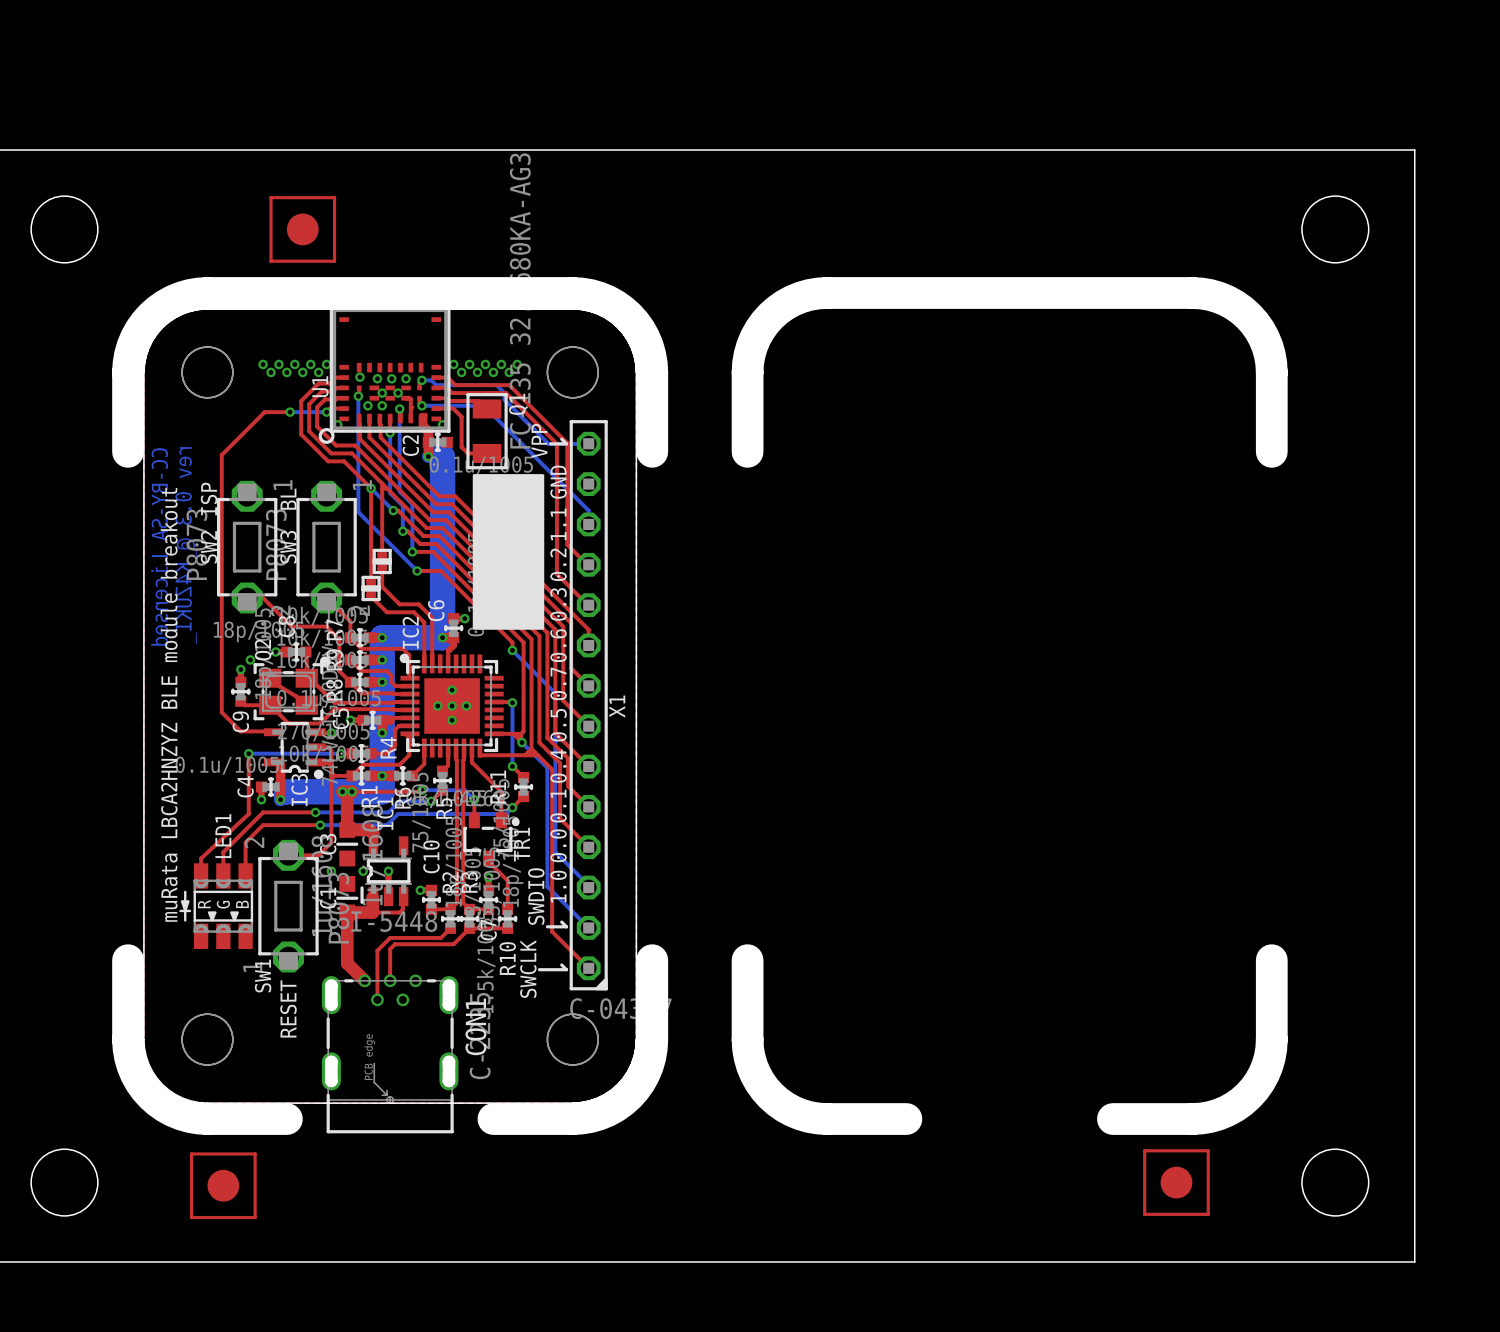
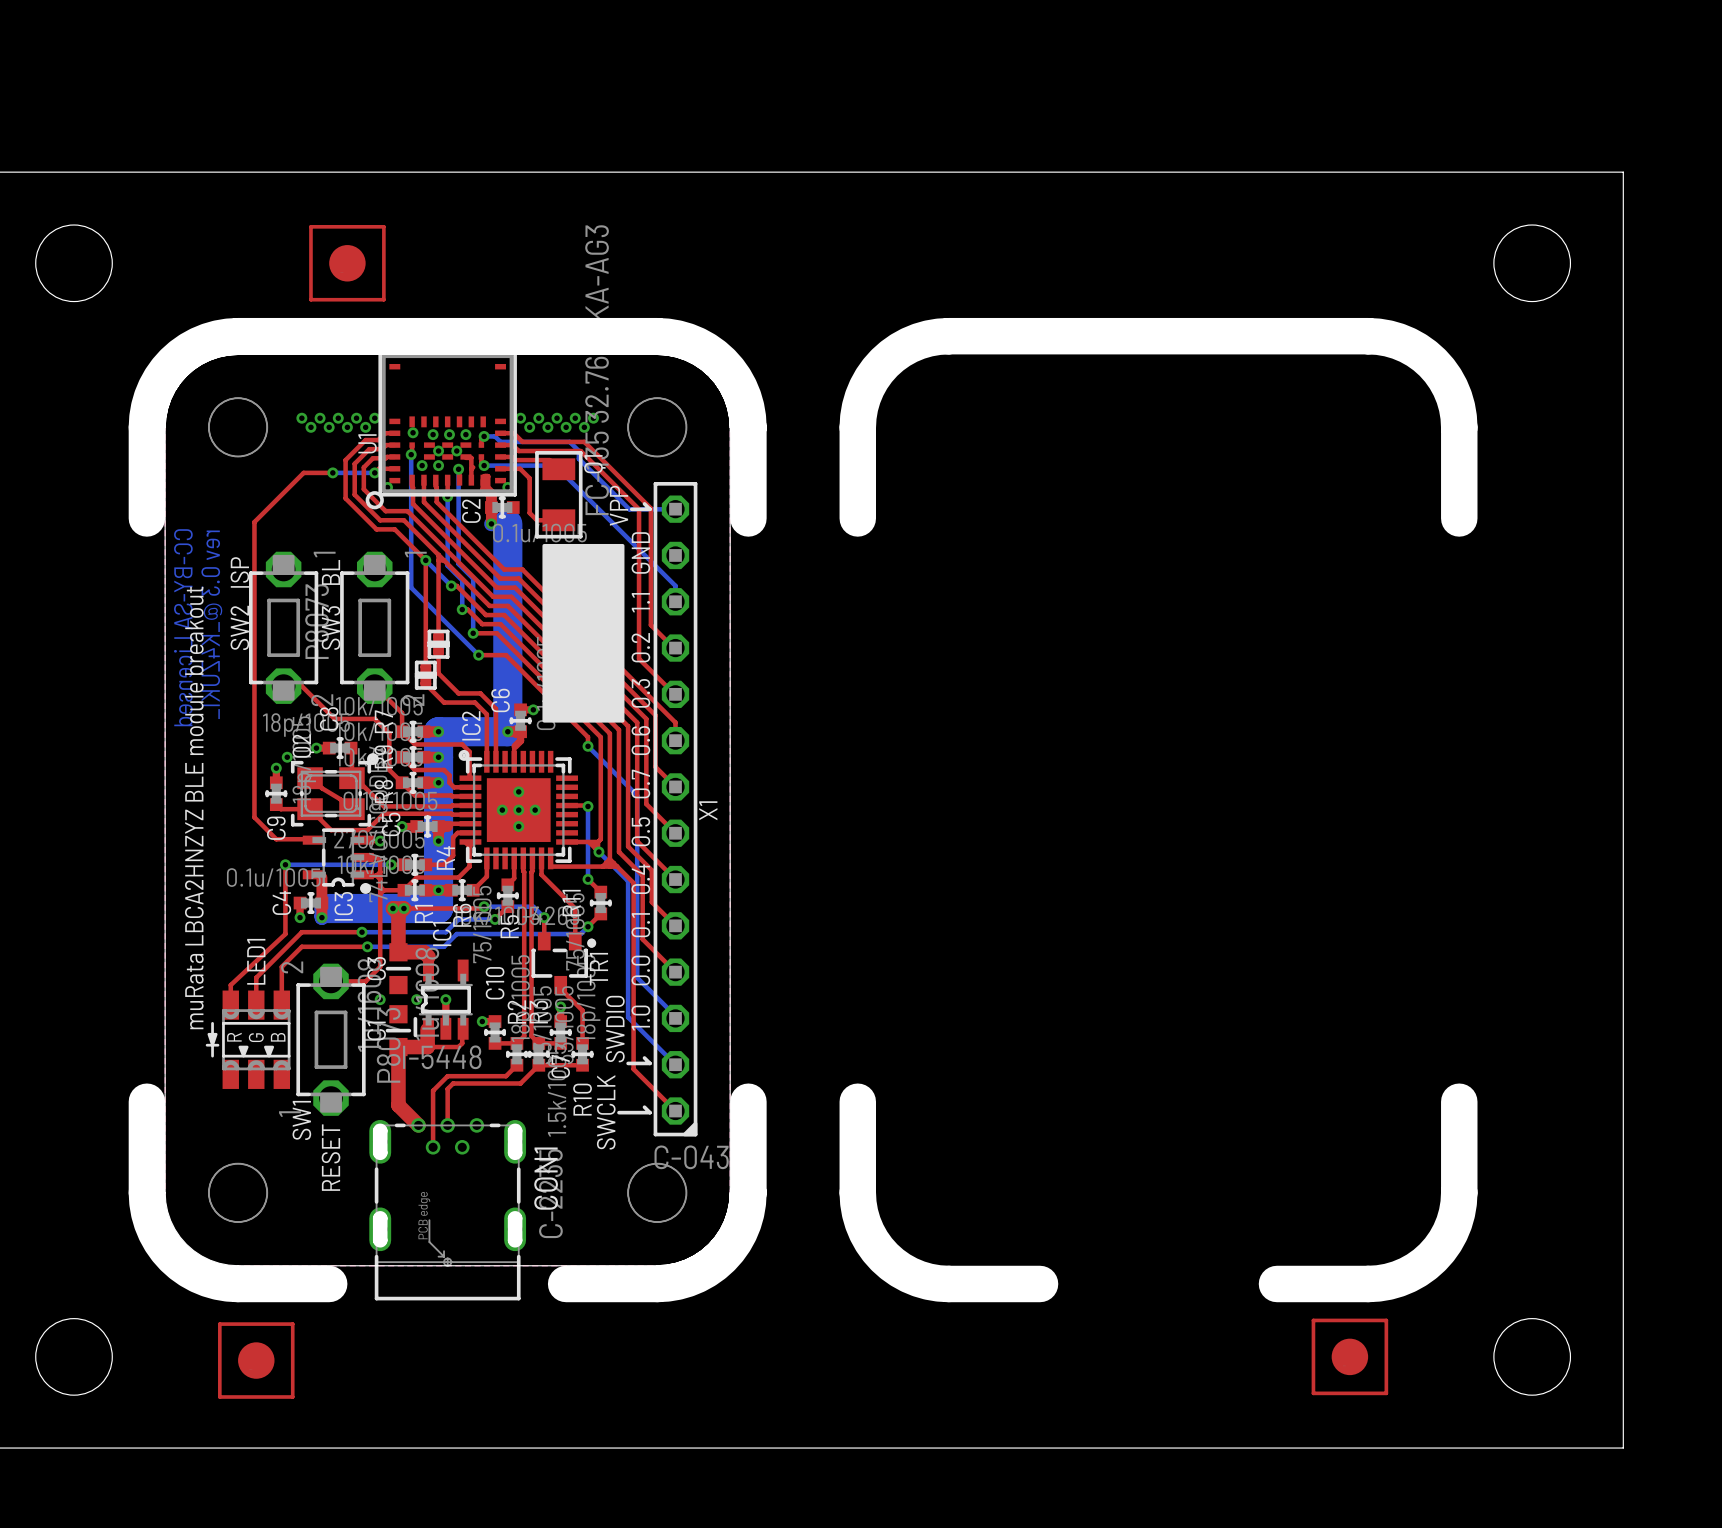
SW2 value: P8073 (196, 544) -> none

